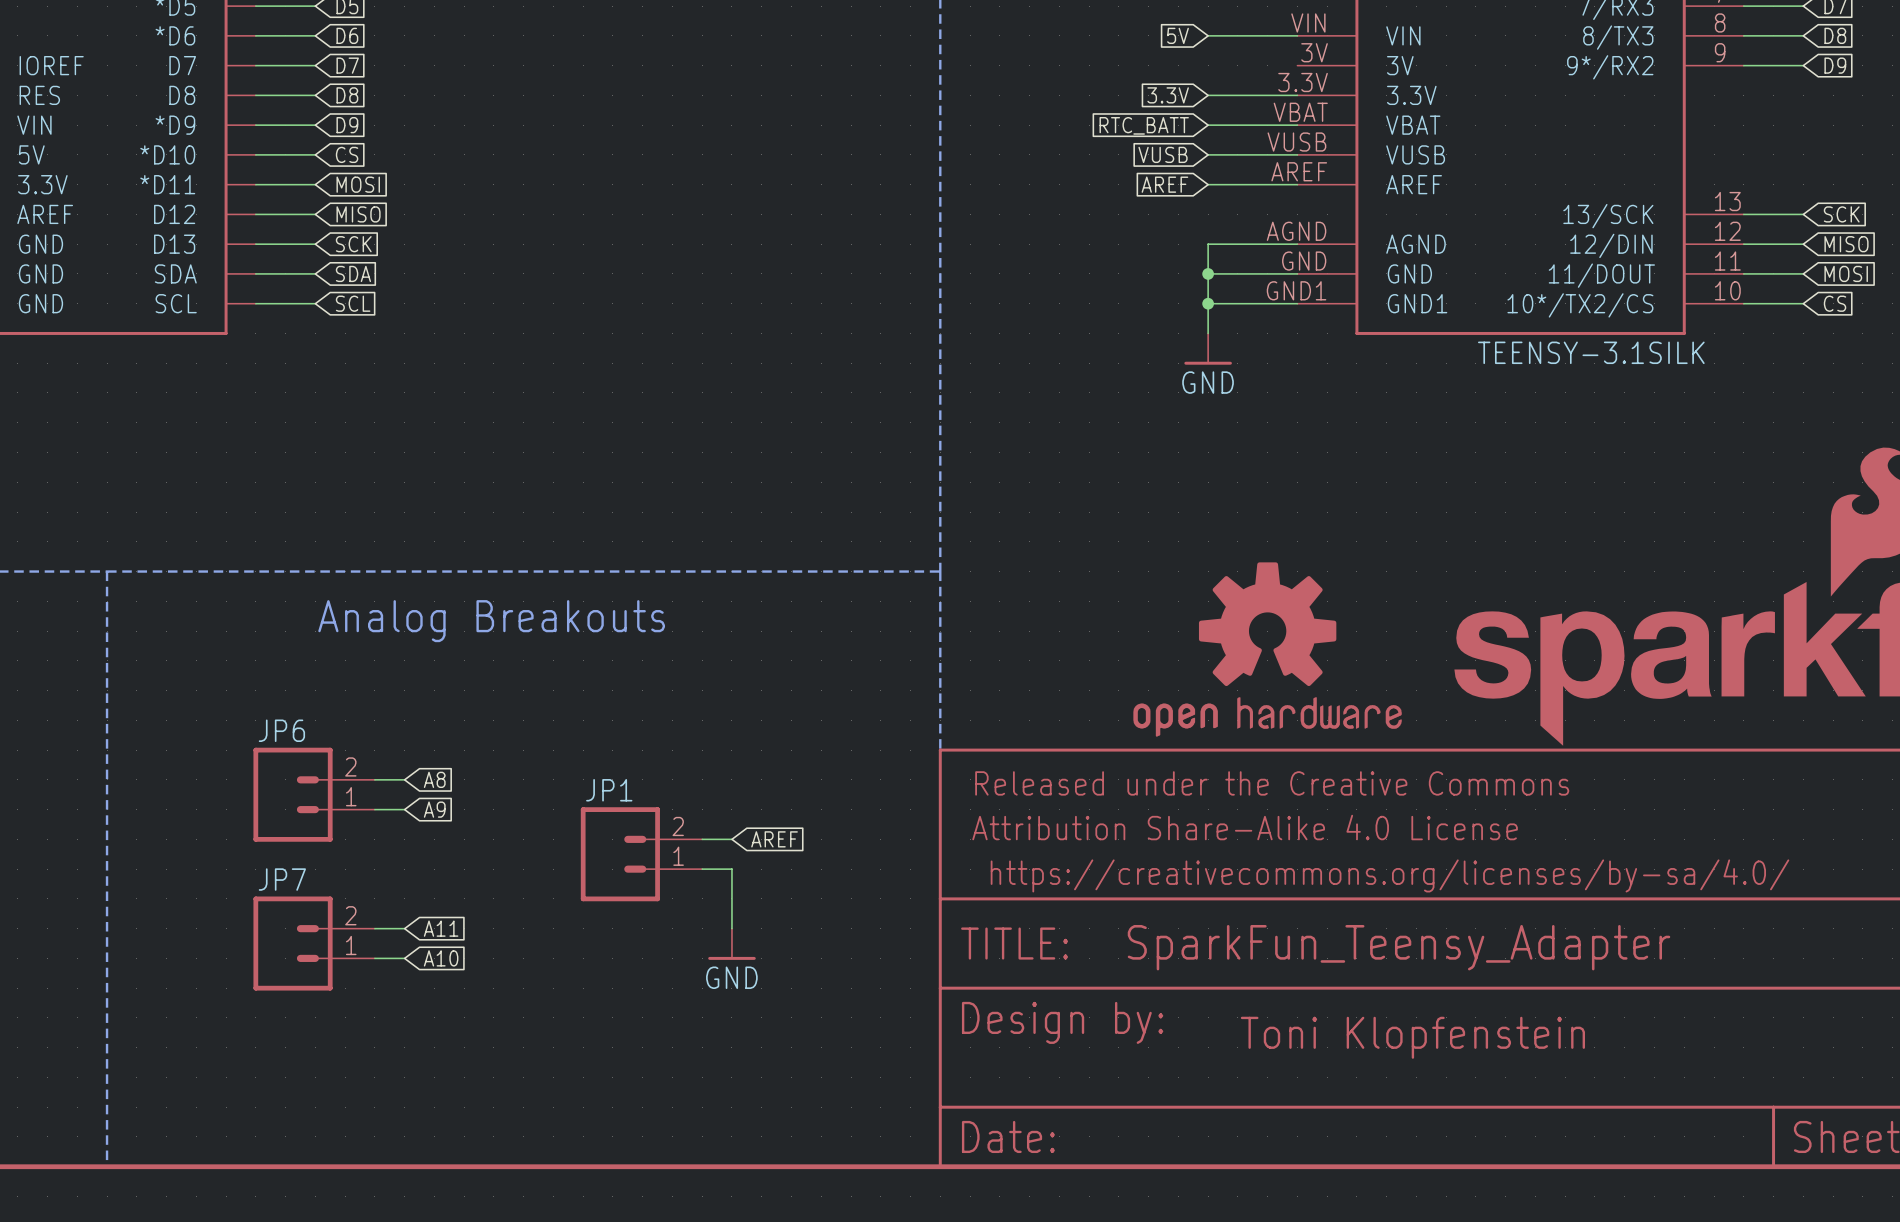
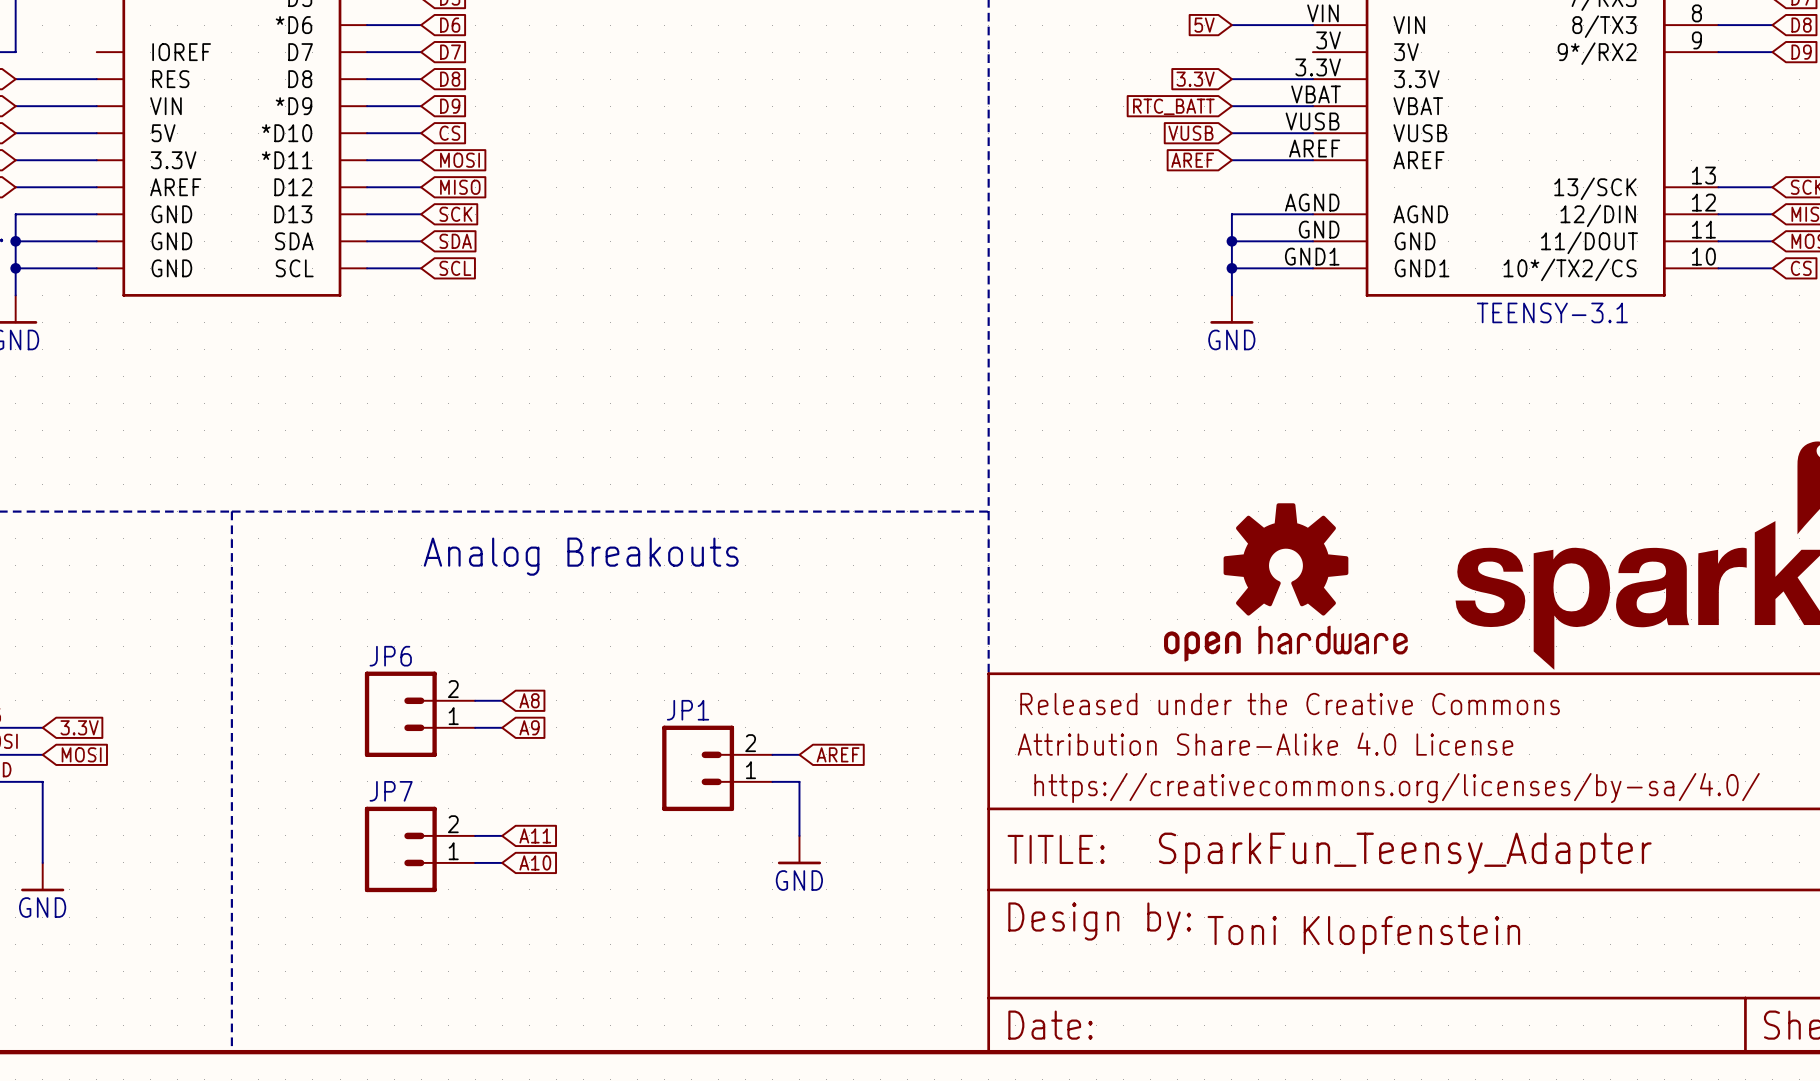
part value: TEENSY-3.1SILK (1591, 352) -> TEENSY-3.1 (1552, 312)
text position: Toni Klopfenstein (1412, 1037) -> Toni Klopfenstein (1363, 935)

